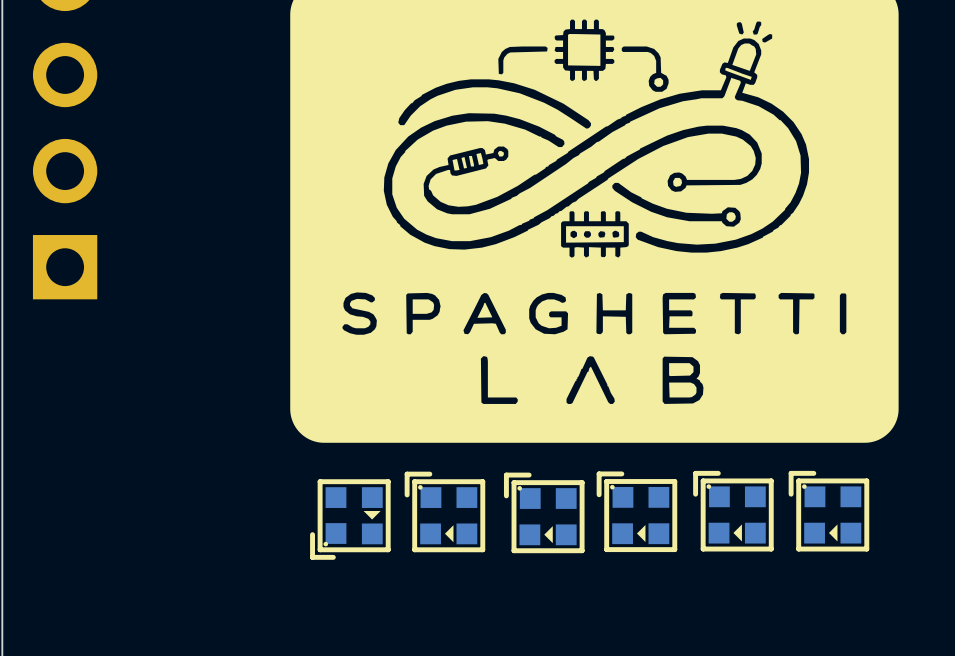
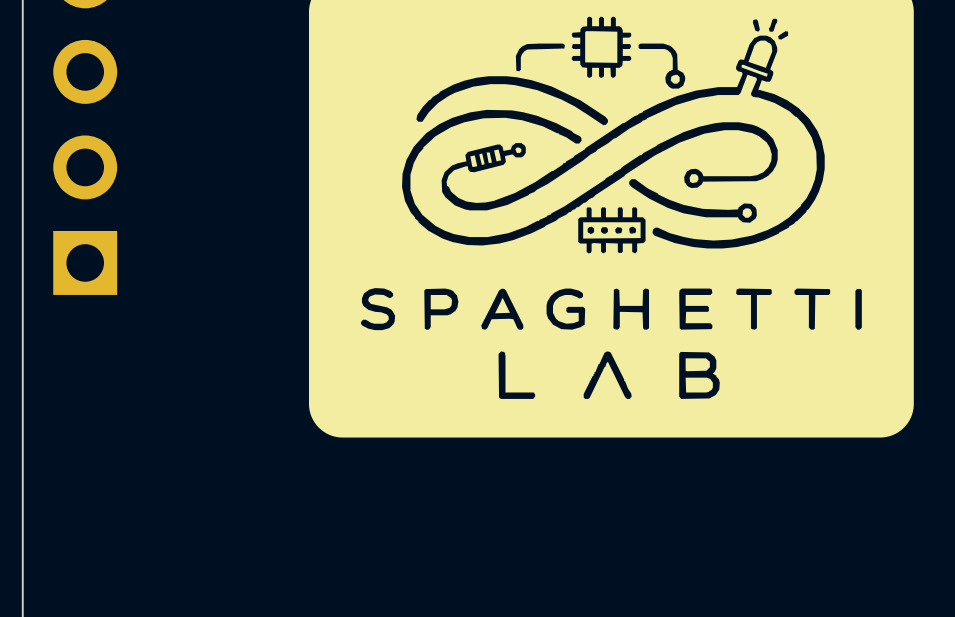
part: (444, 511) -> none
part: (636, 511) -> none
part: (733, 511) -> none
part: (828, 511) -> none
part: (544, 512) -> none
part: (350, 519) -> none

